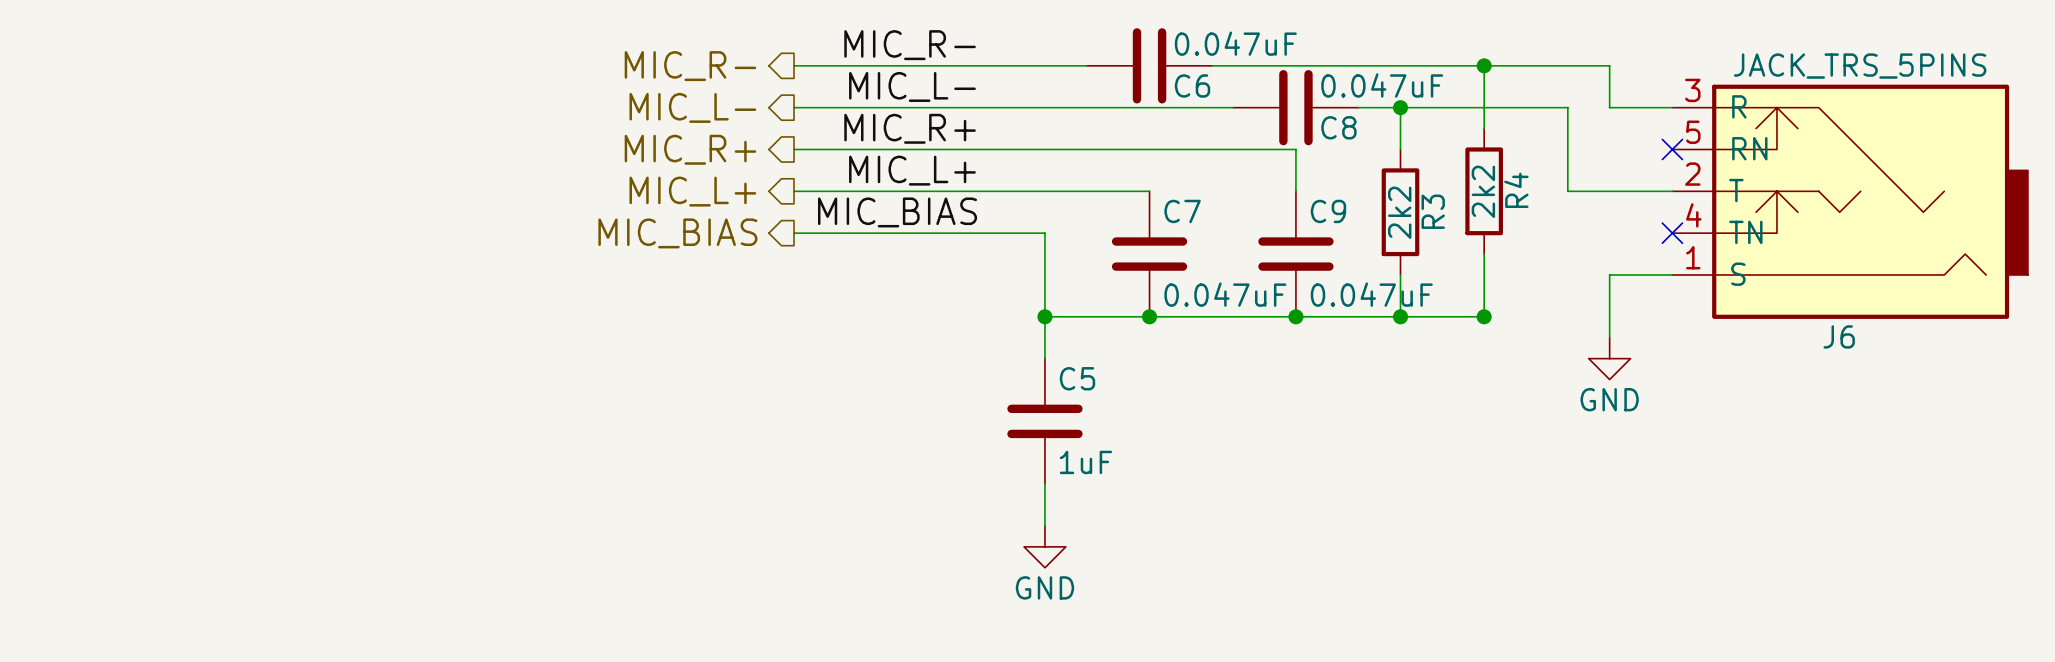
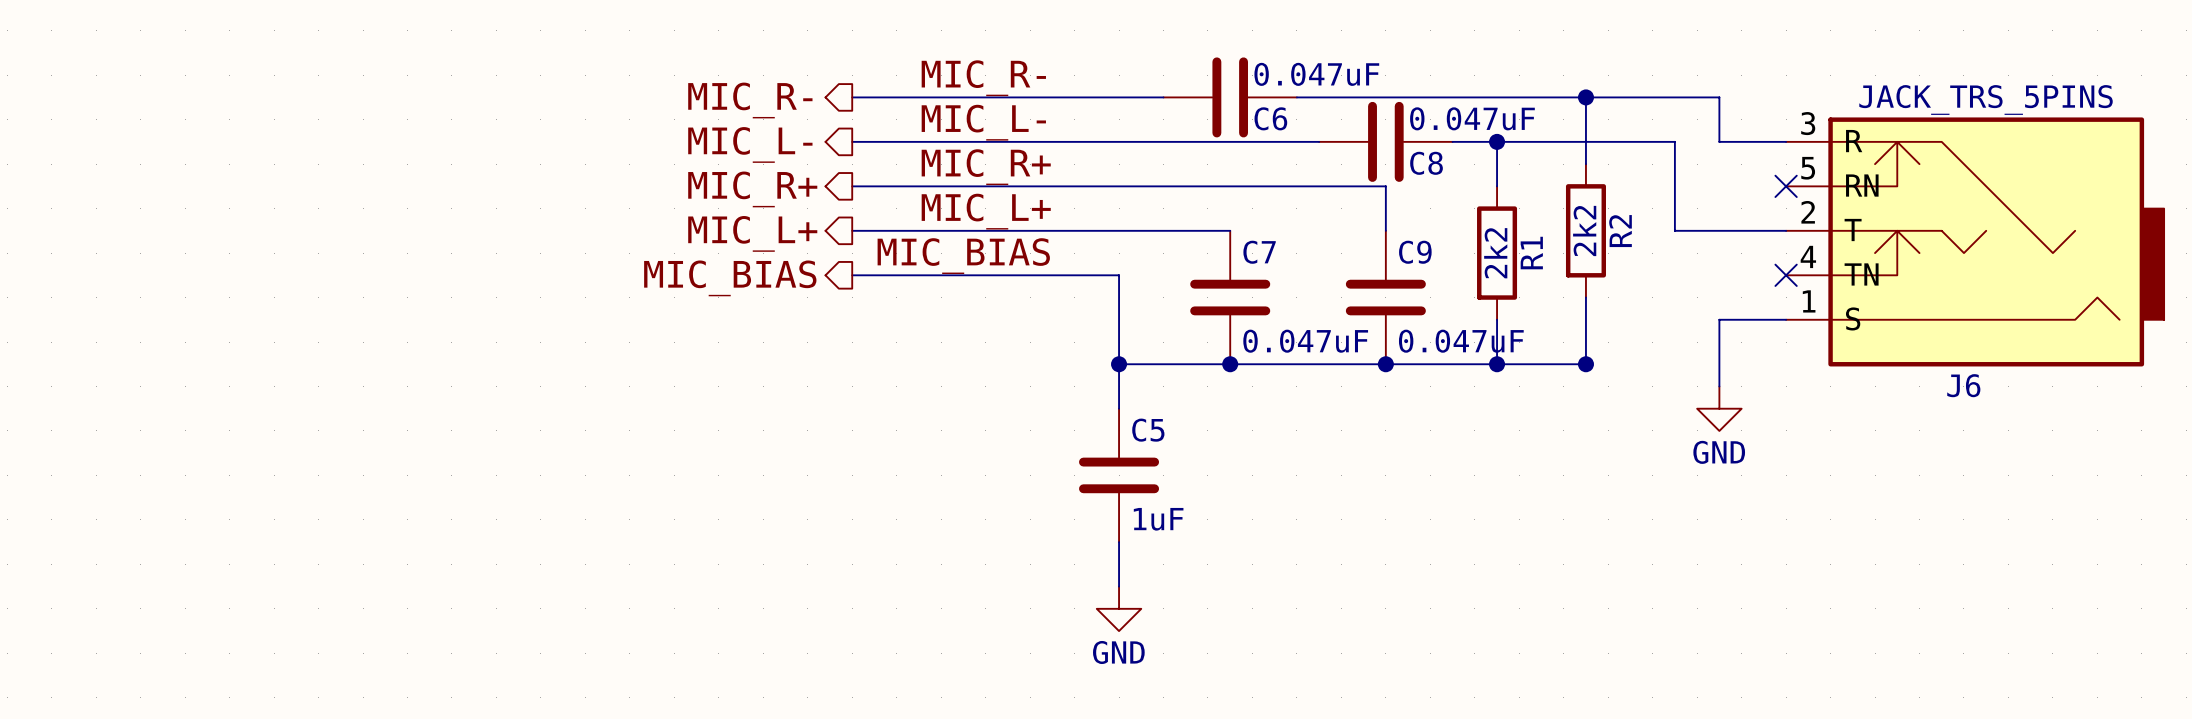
R4 name: R4 (1516, 190) -> R2 (1620, 231)
R3 name: R3 (1433, 211) -> R1 (1531, 253)

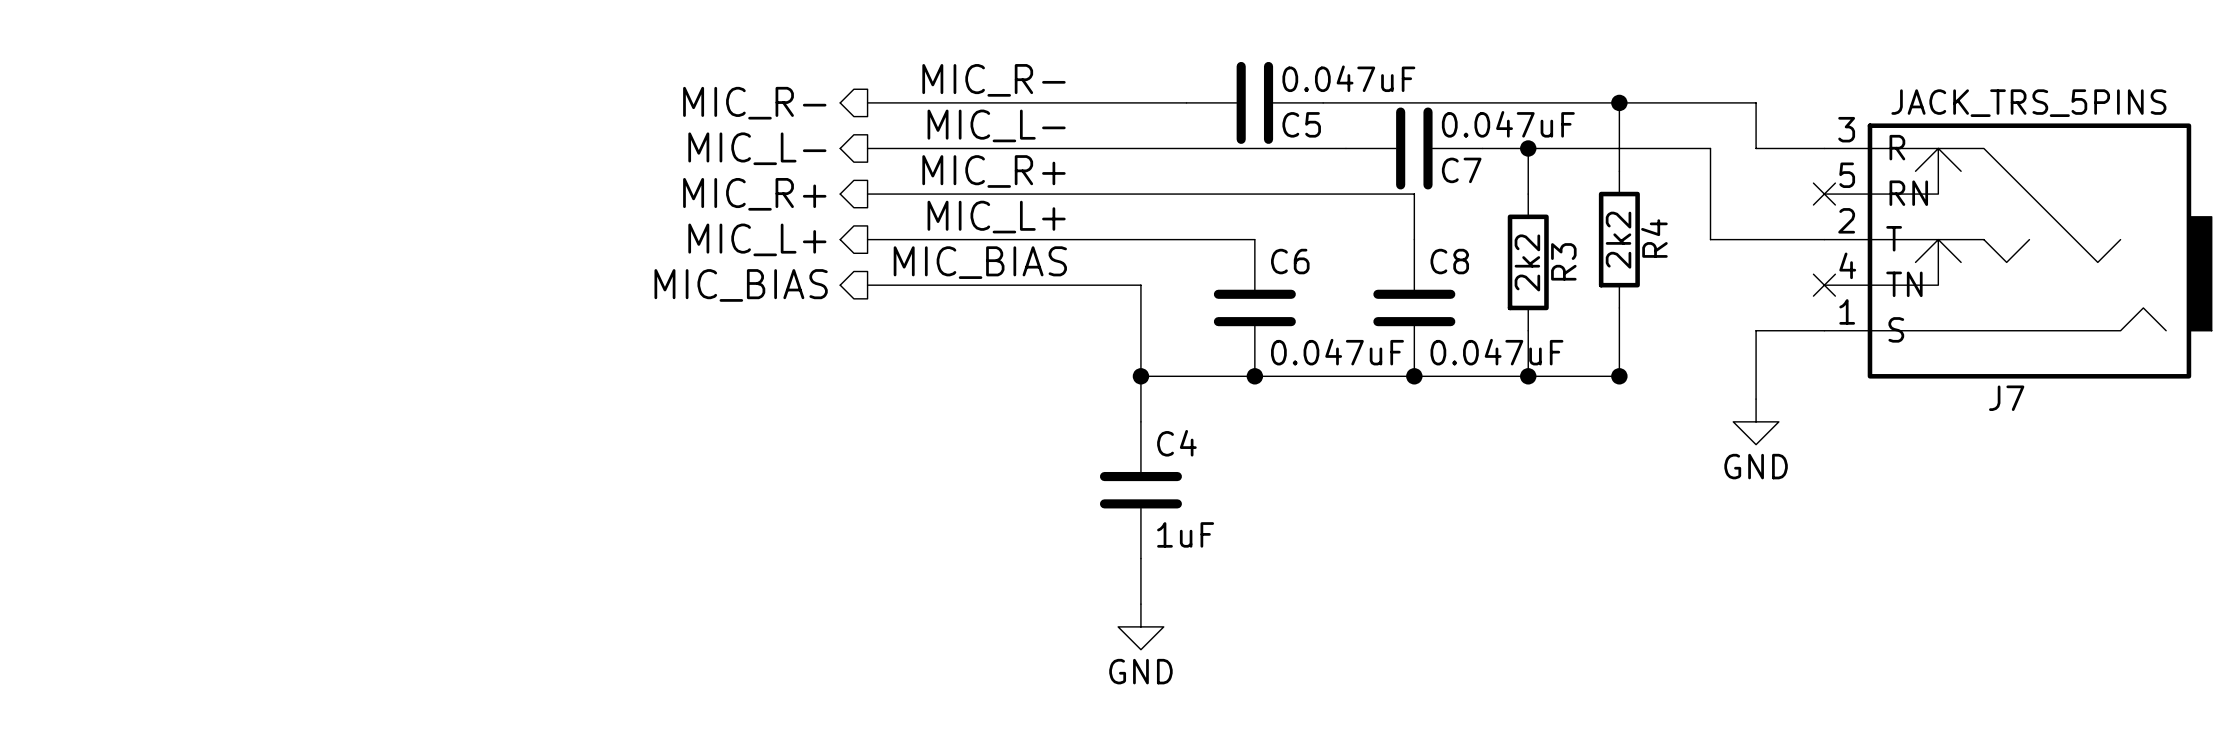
C6 name: C6 (1270, 118) -> C5 (1301, 124)
C8 name: C8 (1426, 163) -> C7 (1461, 170)
R2 name: R2 (1620, 231) -> R4 (1654, 238)
C7 name: C7 (1259, 252) -> C6 (1290, 261)
C9 name: C9 (1415, 252) -> C8 (1449, 261)
R1 name: R1 (1531, 253) -> R3 (1563, 261)
J6 name: J6 (1963, 385) -> J7 (2006, 398)
C5 name: C5 (1148, 430) -> C4 (1176, 443)

